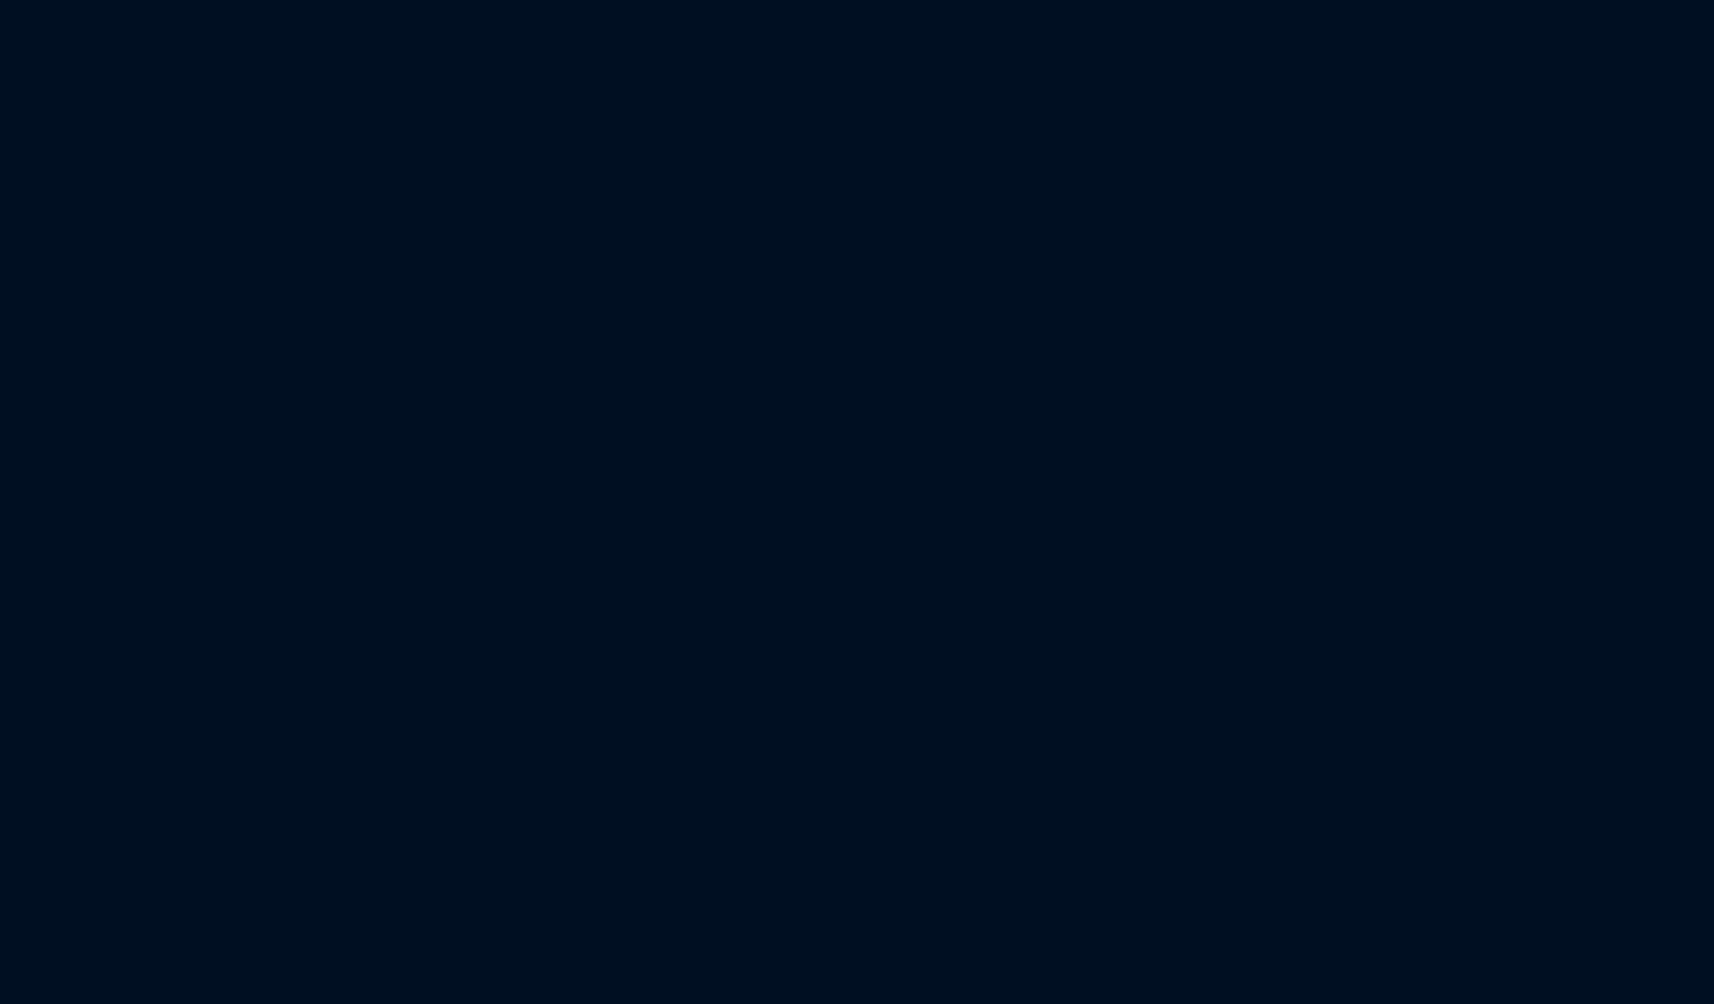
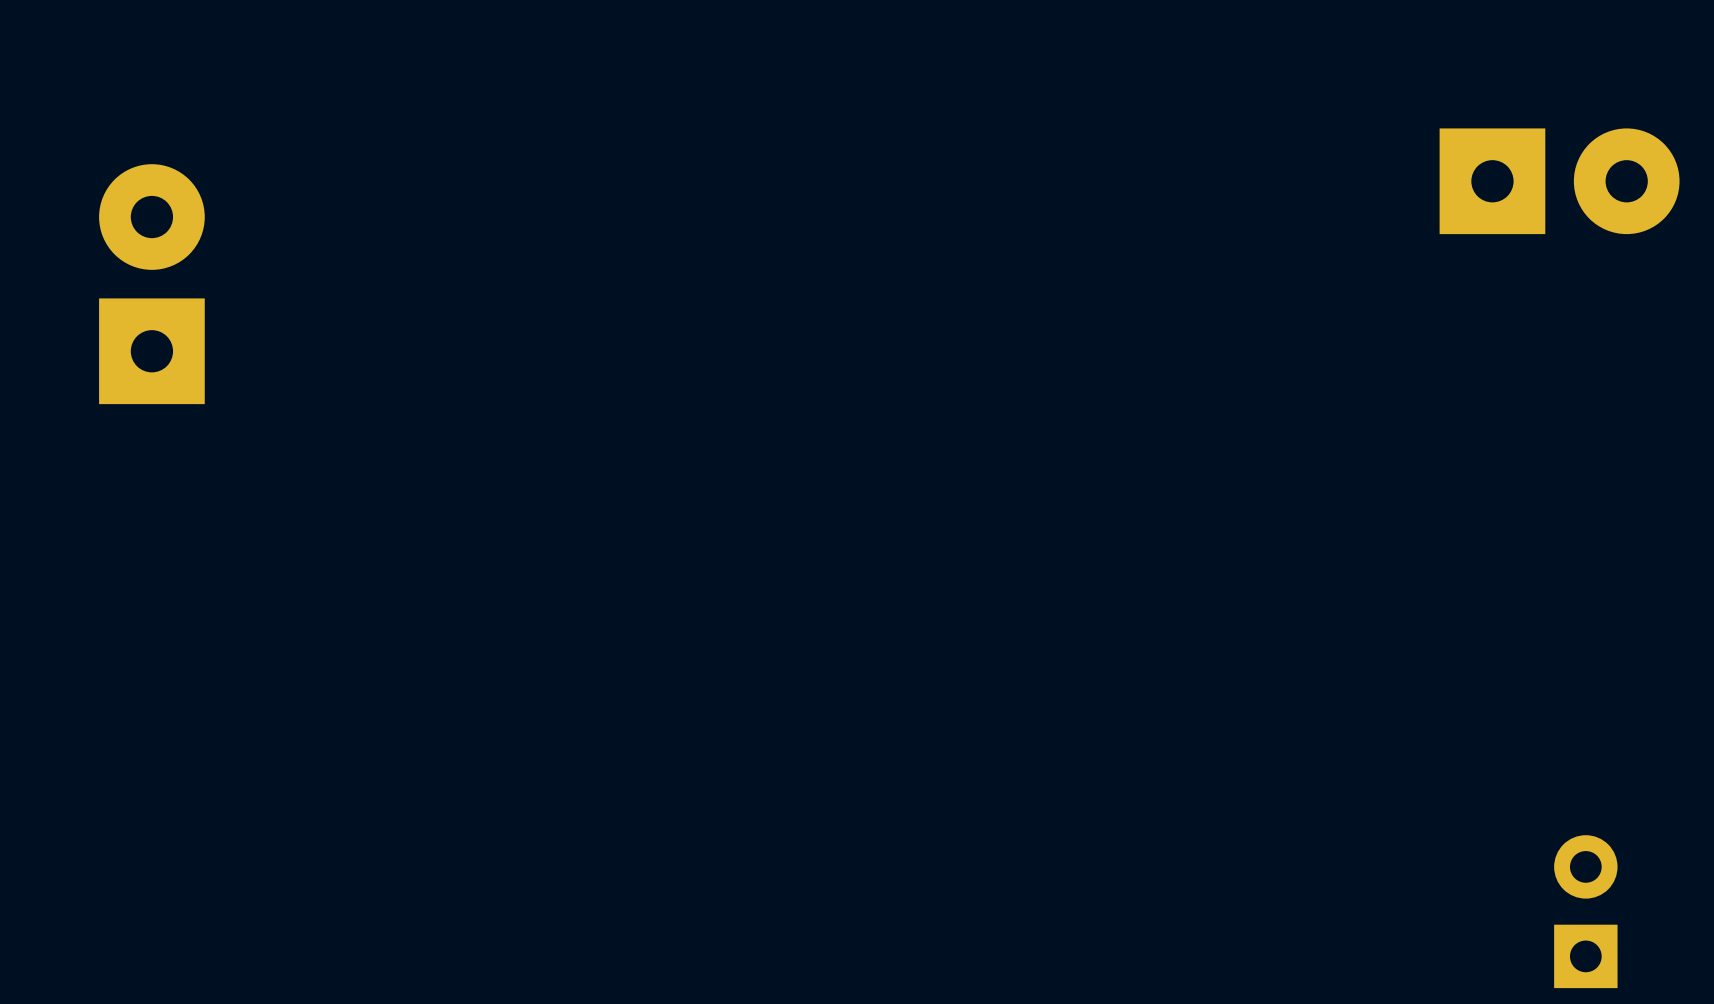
part: none -> (1559, 181)
part: none -> (151, 284)
part: none -> (1585, 911)

